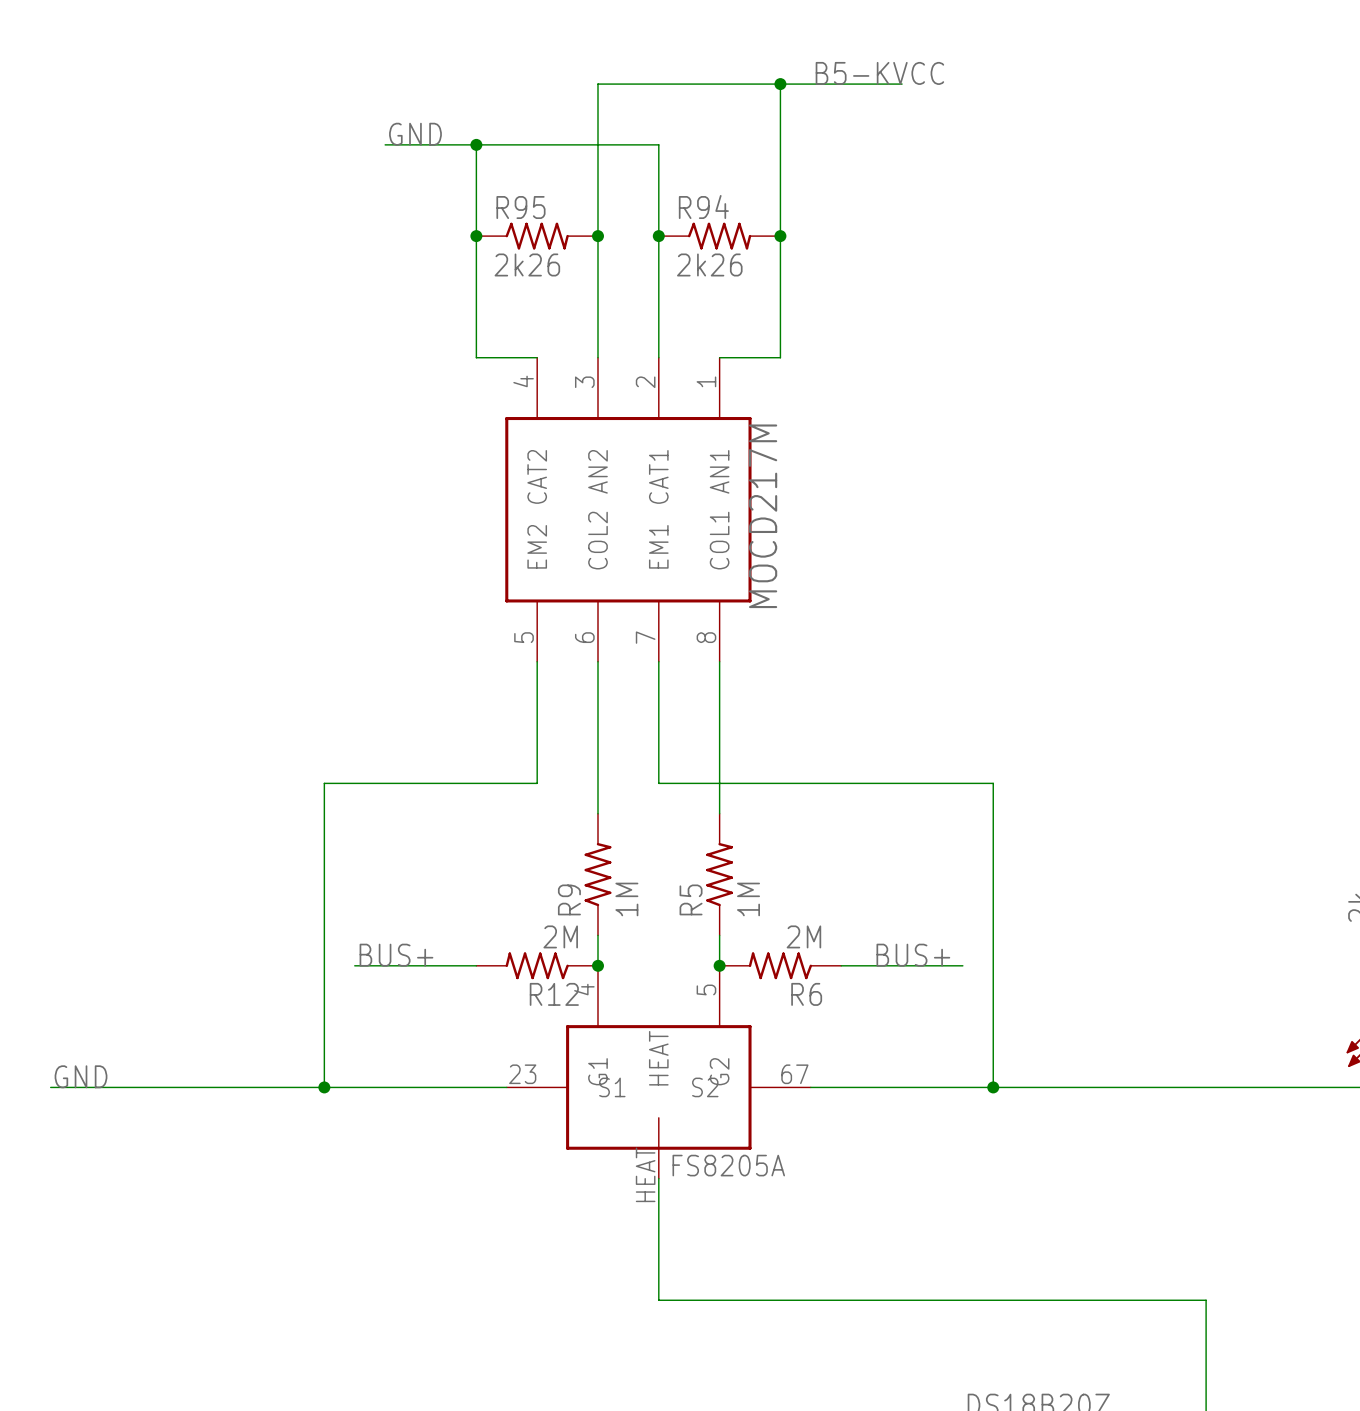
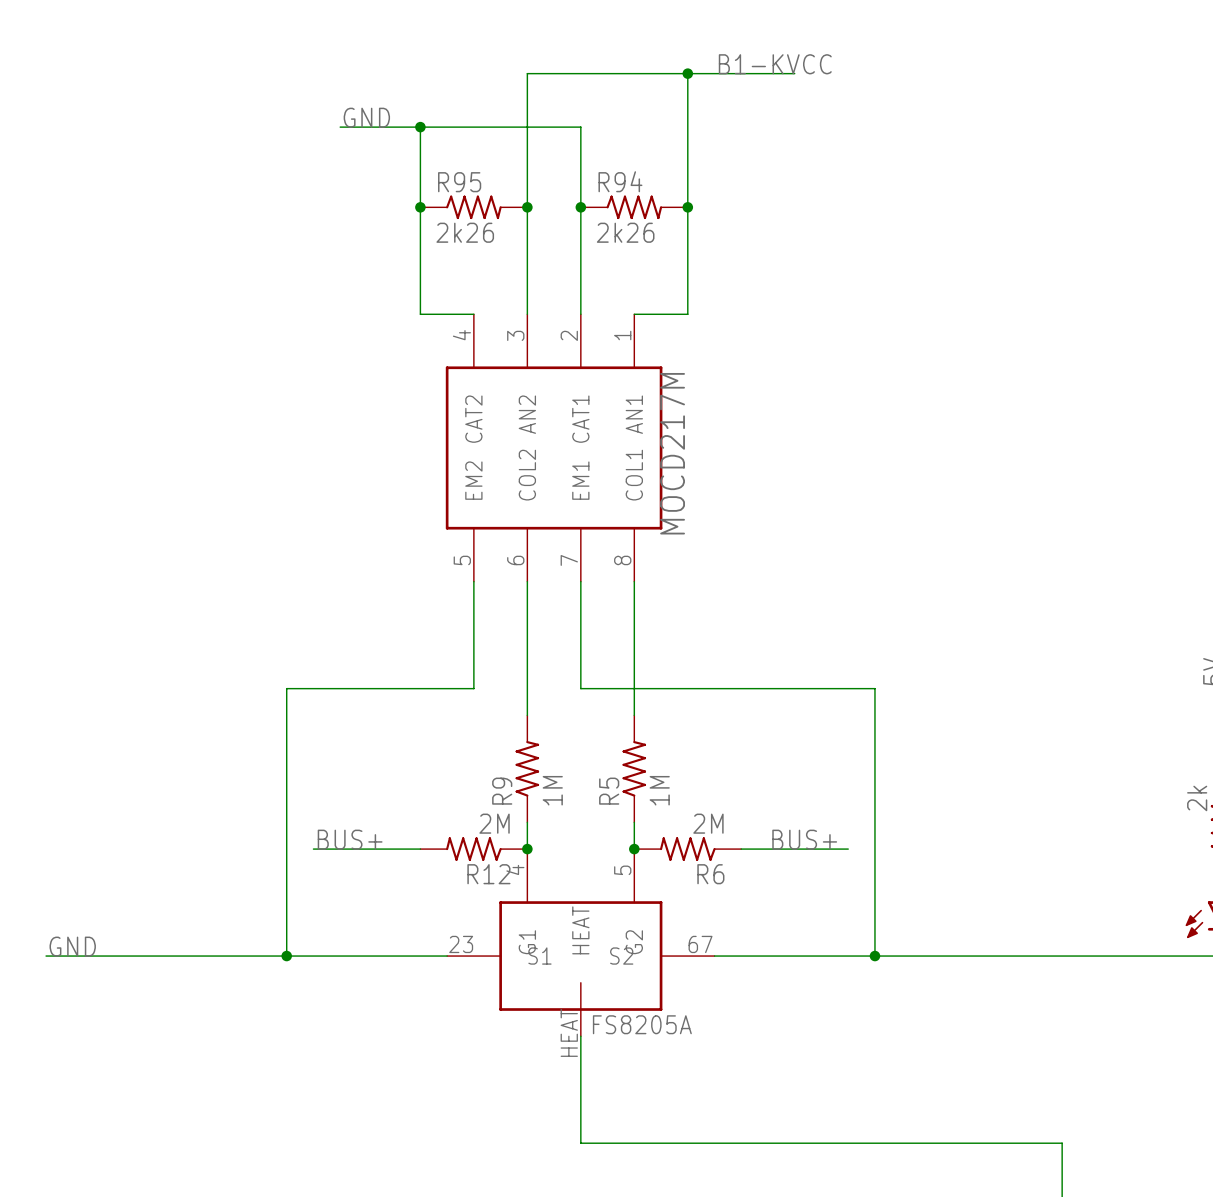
label: B5-KVCC (879, 73) -> B1-KVCC (775, 64)

